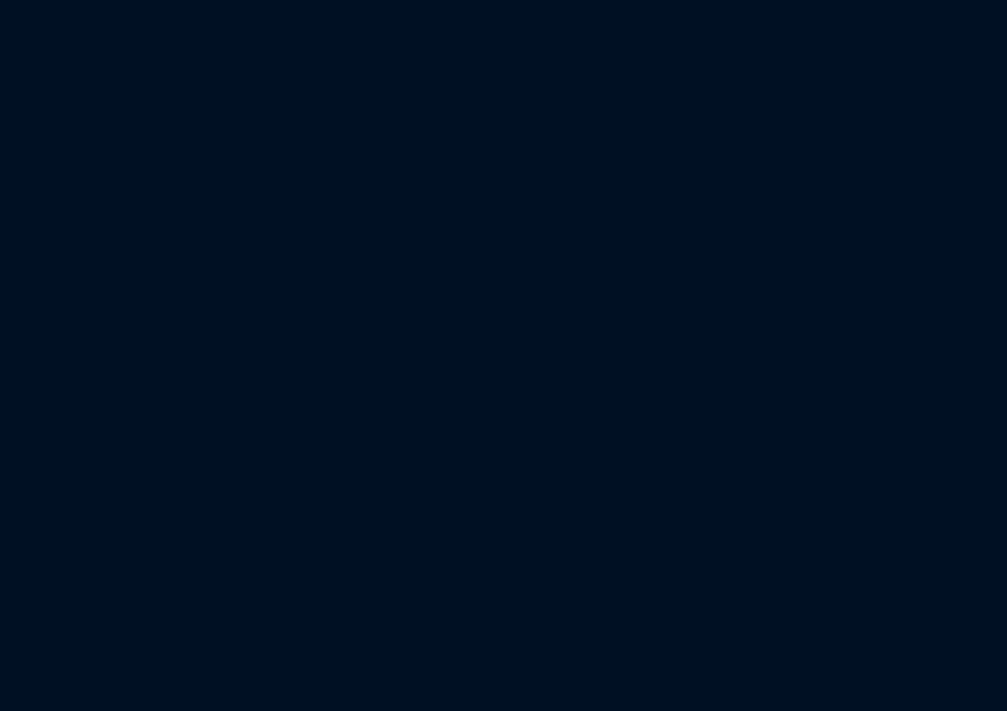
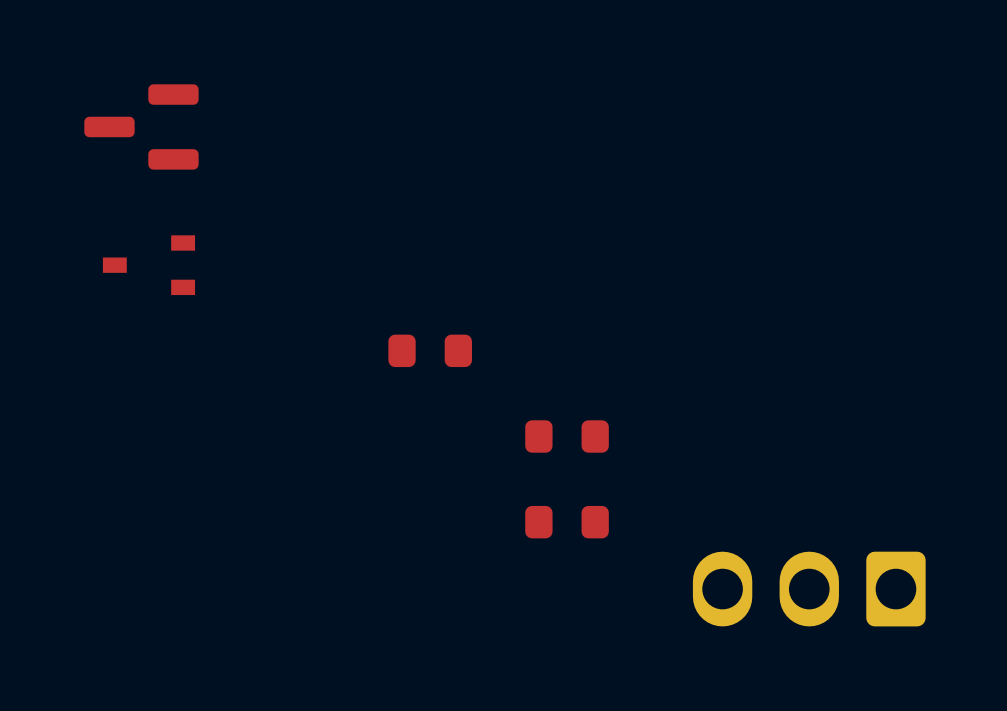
part: none -> (141, 126)
part: none -> (148, 265)
part: none -> (430, 350)
part: none -> (567, 436)
part: none -> (567, 522)
part: none -> (809, 589)

